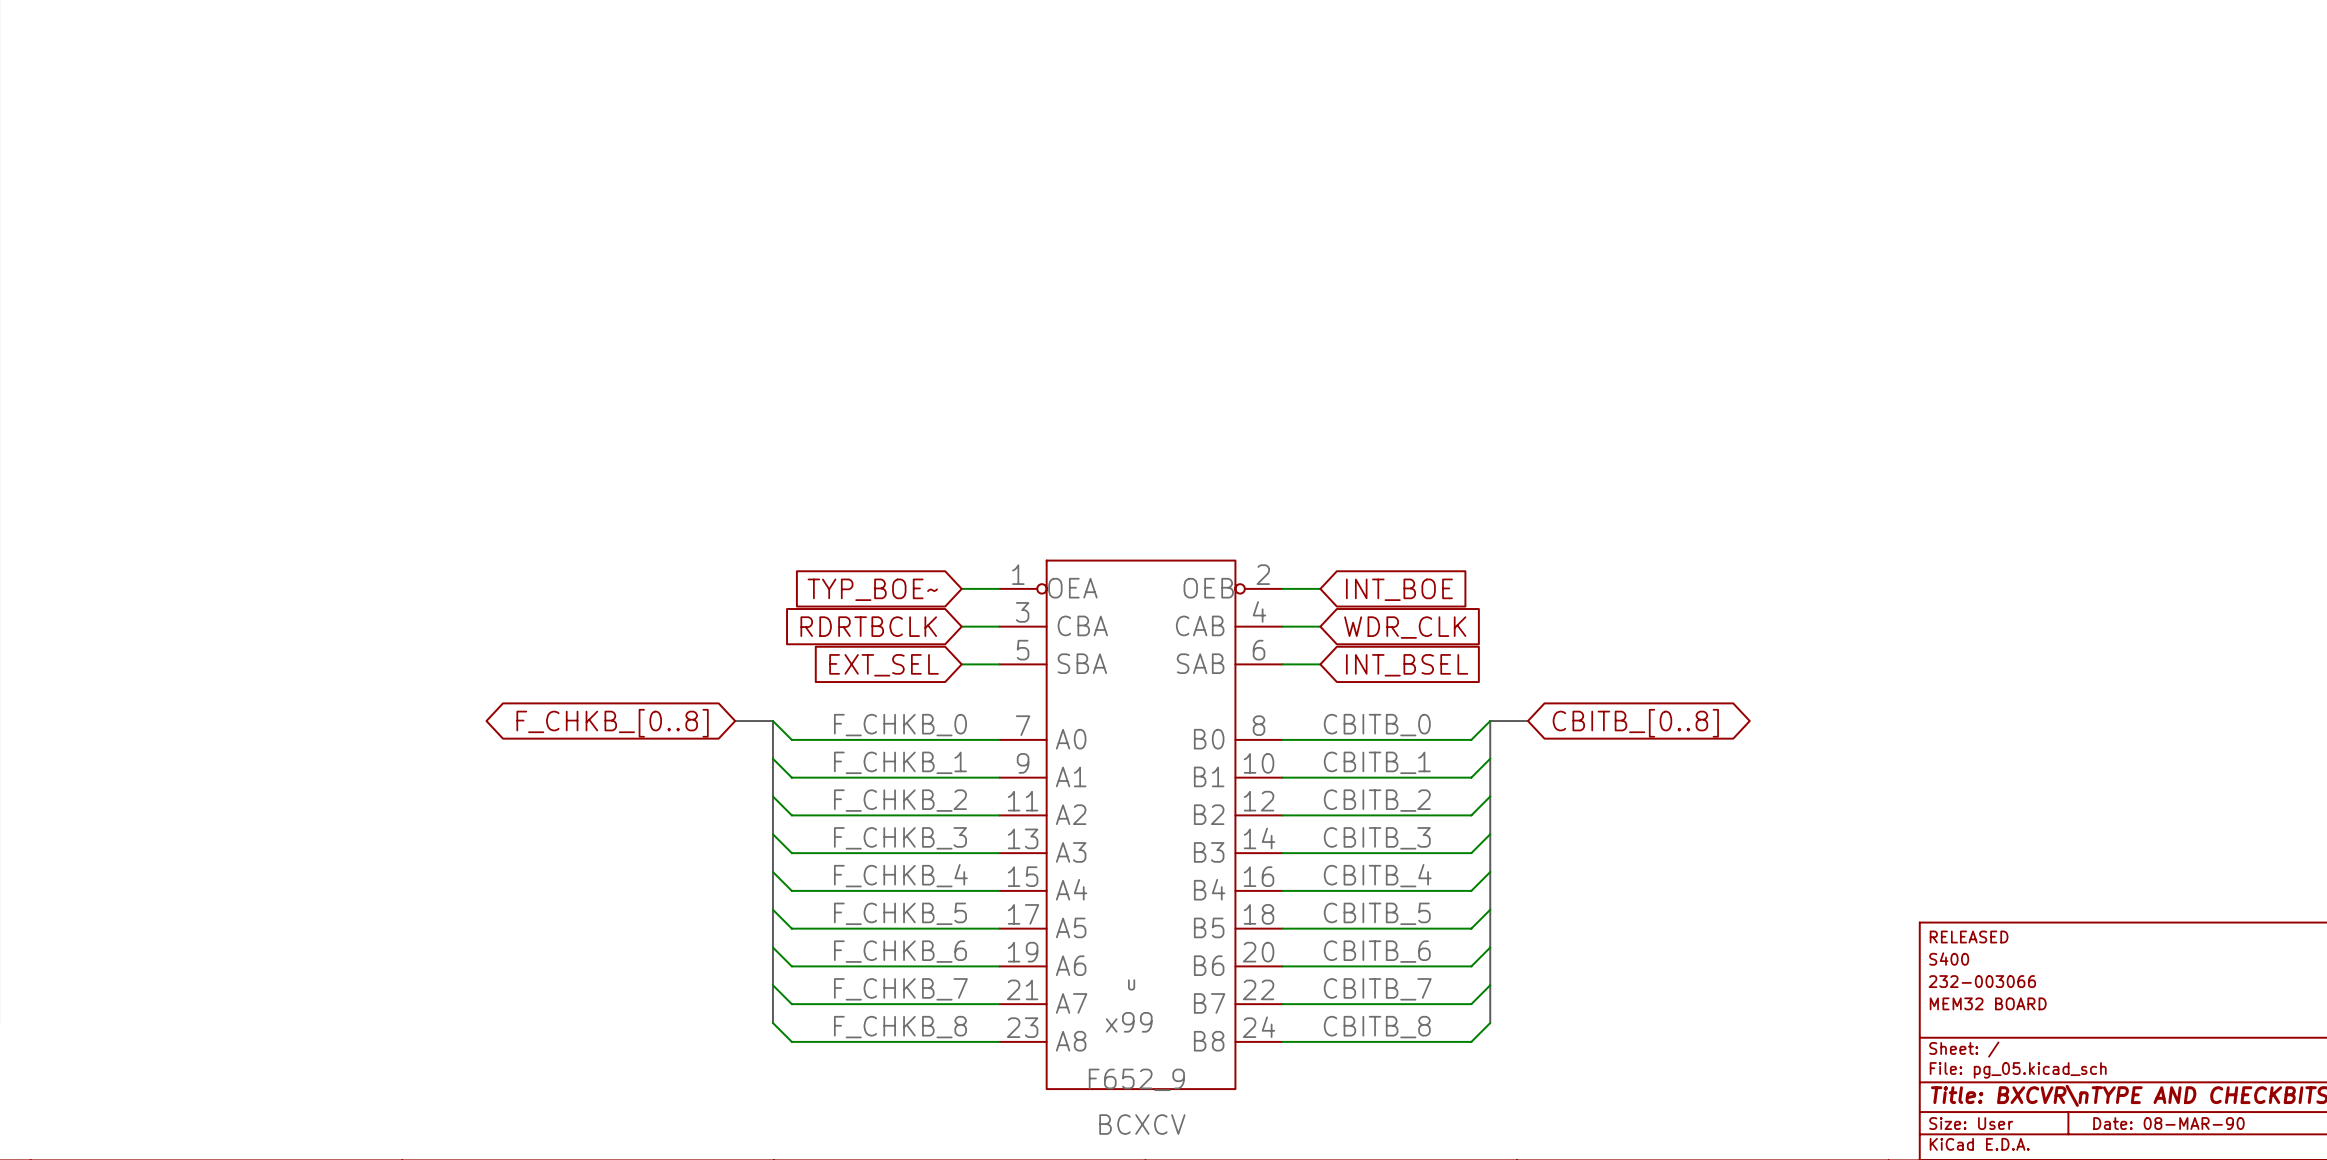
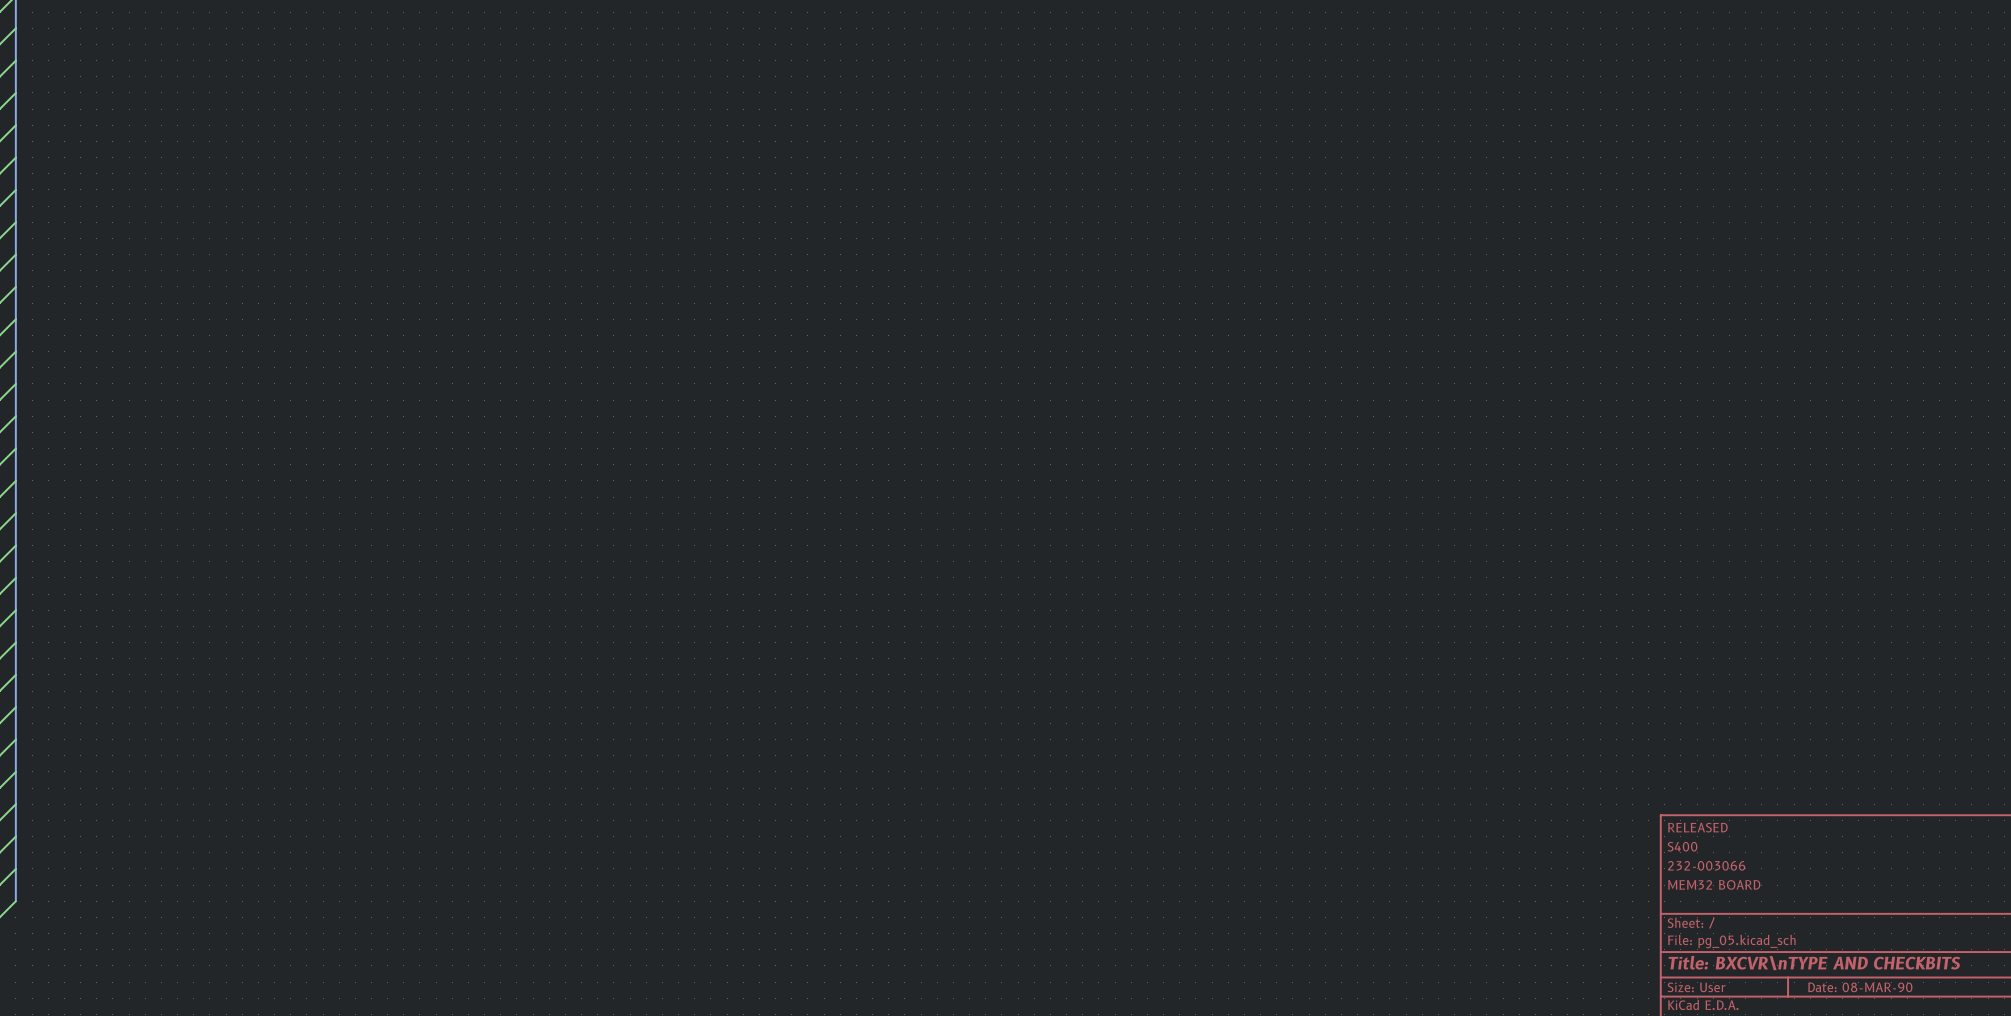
wire: (961, 588) (999, 588) -> none
wire: (1282, 588) (1320, 588) -> none
global label: TYP_BOE~ (872, 589) -> none
global label: INT_BOE (1399, 589) -> none
global label: RDRTBCLK (868, 626) -> none
wire: (961, 626) (999, 626) -> none
wire: (1282, 626) (1320, 626) -> none
global label: WDR_CLK (1405, 627) -> none
wire: (961, 664) (999, 664) -> none
wire: (1282, 664) (1320, 664) -> none
global label: EXT_SEL (884, 665) -> none
global label: INT_BSEL (1407, 665) -> none
bus: (735, 721) (772, 721) (772, 1023) -> none
wire: (772, 721) (791, 739) (999, 739) -> none
wire: (1490, 721) (1471, 739) (1282, 739) -> none
bus: (1527, 721) (1490, 721) (1490, 1023) -> none
global label: F_CHKB_[0..8] (612, 723) -> none
global label: CBITB_[0..8] (1635, 723) -> none
label: F_CHKB_0 (900, 725) -> none
label: CBITB_0 (1377, 725) -> none
wire: (772, 758) (791, 777) (999, 777) -> none
wire: (1490, 758) (1471, 777) (1282, 777) -> none
label: F_CHKB_1 (900, 762) -> none
label: CBITB_1 (1377, 762) -> none
wire: (772, 796) (791, 815) (999, 815) -> none
wire: (1490, 796) (1471, 815) (1282, 815) -> none
label: F_CHKB_2 (900, 800) -> none
label: CBITB_2 (1377, 800) -> none
U: F652_9 (1141, 824) -> none
wire: (772, 834) (791, 853) (999, 853) -> none
wire: (1490, 834) (1471, 853) (1282, 853) -> none
label: F_CHKB_3 (900, 838) -> none
label: CBITB_3 (1377, 838) -> none
wire: (772, 872) (791, 890) (999, 890) -> none
wire: (1490, 872) (1471, 890) (1282, 890) -> none
label: F_CHKB_4 (900, 875) -> none
label: CBITB_4 (1377, 875) -> none
wire: (772, 909) (791, 928) (999, 928) -> none
wire: (1490, 909) (1471, 928) (1282, 928) -> none
label: F_CHKB_5 (900, 913) -> none
label: CBITB_5 (1377, 913) -> none
wire: (772, 947) (791, 966) (999, 966) -> none
wire: (1490, 947) (1471, 966) (1282, 966) -> none
label: F_CHKB_6 (900, 951) -> none
label: CBITB_6 (1377, 951) -> none
wire: (772, 985) (791, 1004) (999, 1004) -> none
wire: (1490, 985) (1471, 1004) (1282, 1004) -> none
label: F_CHKB_7 (900, 989) -> none
label: CBITB_7 (1377, 989) -> none
wire: (772, 1023) (791, 1041) (999, 1041) -> none
wire: (1490, 1023) (1471, 1041) (1282, 1041) -> none
label: F_CHKB_8 (900, 1027) -> none
label: CBITB_8 (1377, 1027) -> none

